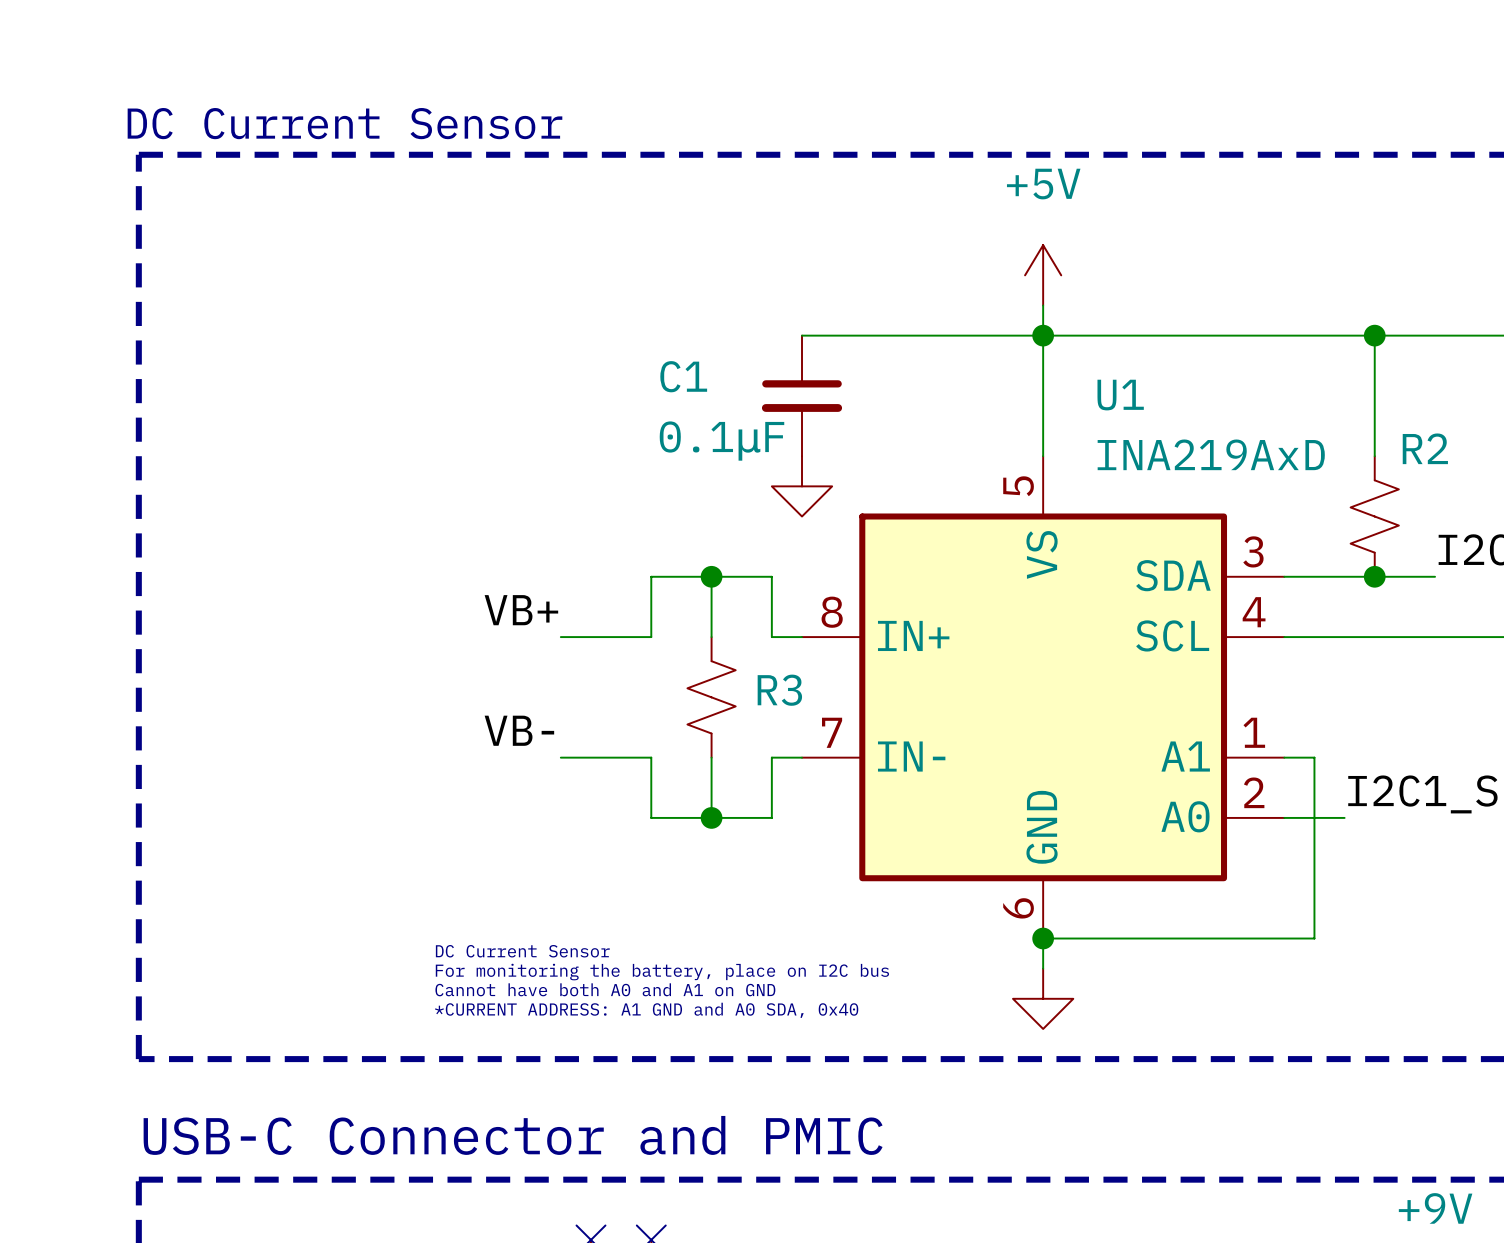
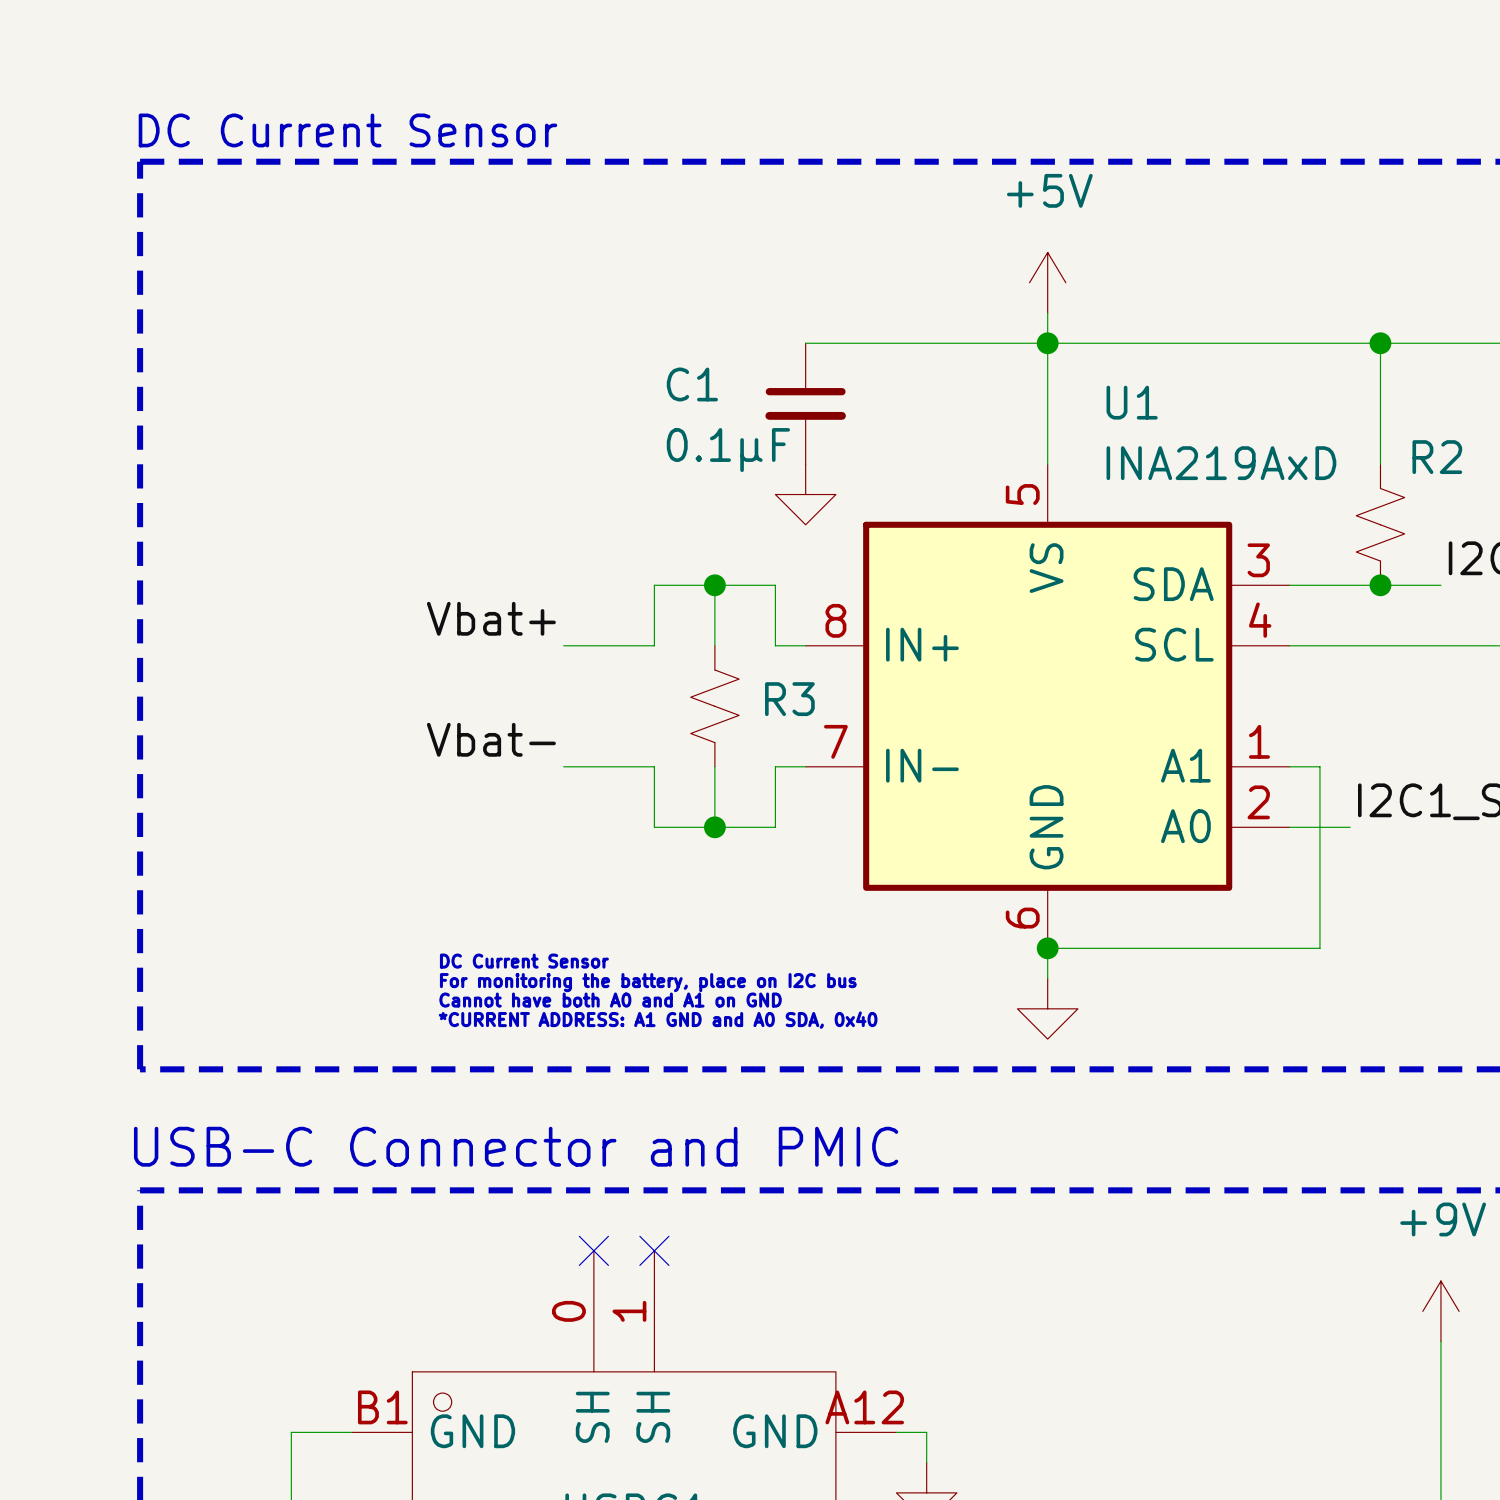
label: VB+ (521, 610) -> Vbat+ (491, 618)
label: VB- (519, 730) -> Vbat- (491, 739)

